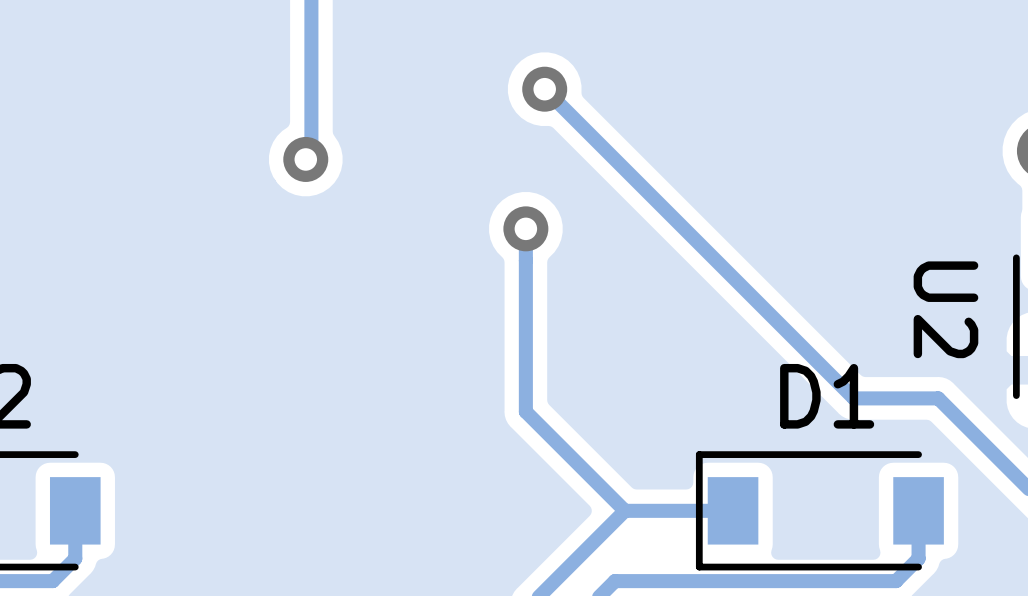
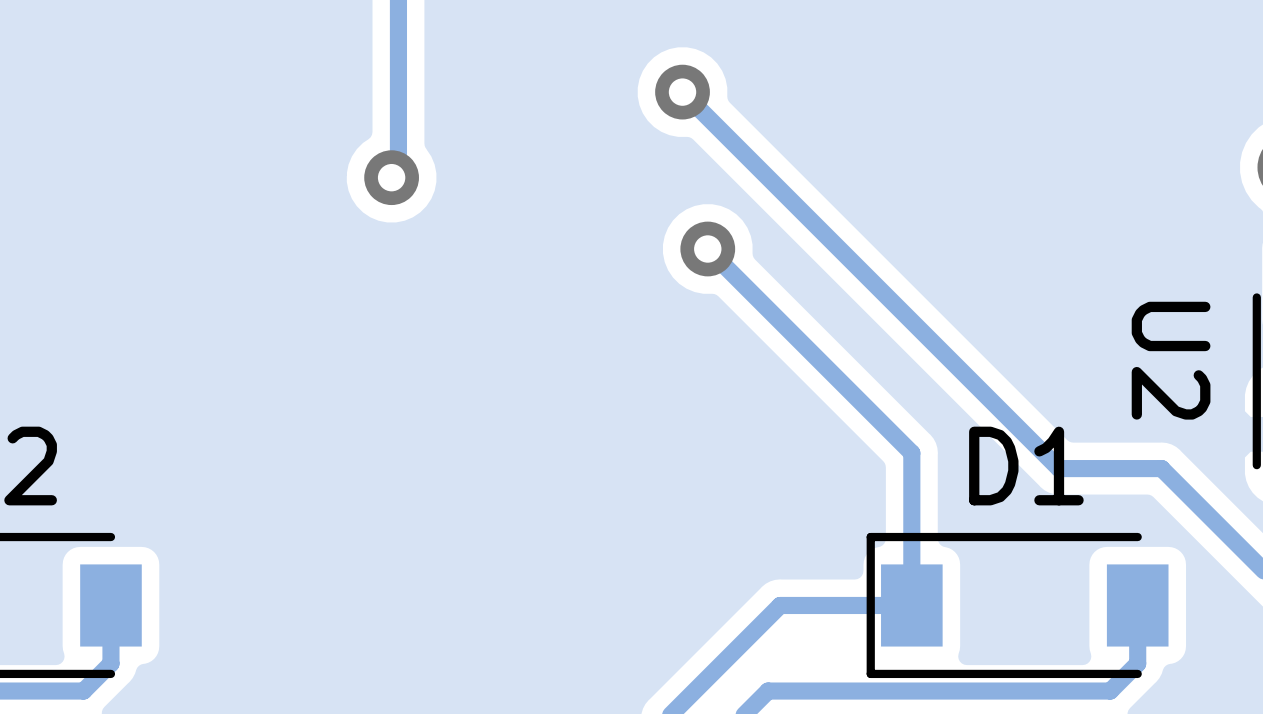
track: none -> (707, 249) (911, 453) (911, 605)
track: (525, 228) (525, 411) (624, 510) -> none
via position: (525, 228) -> (707, 249)

